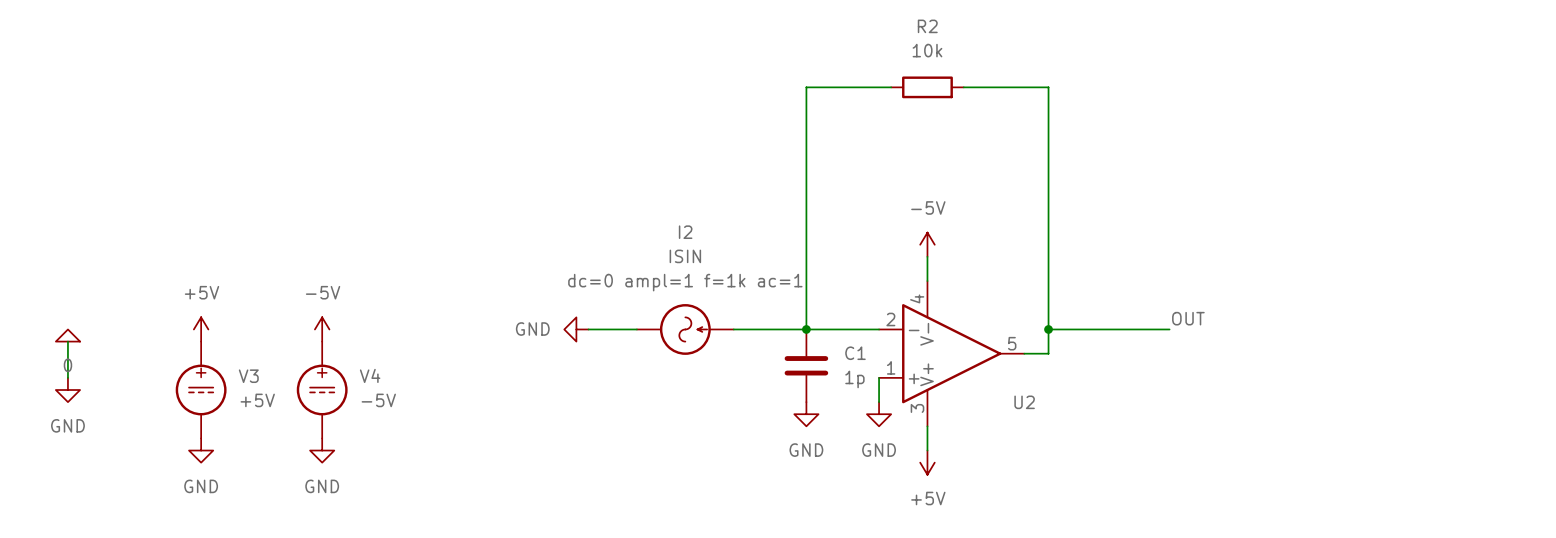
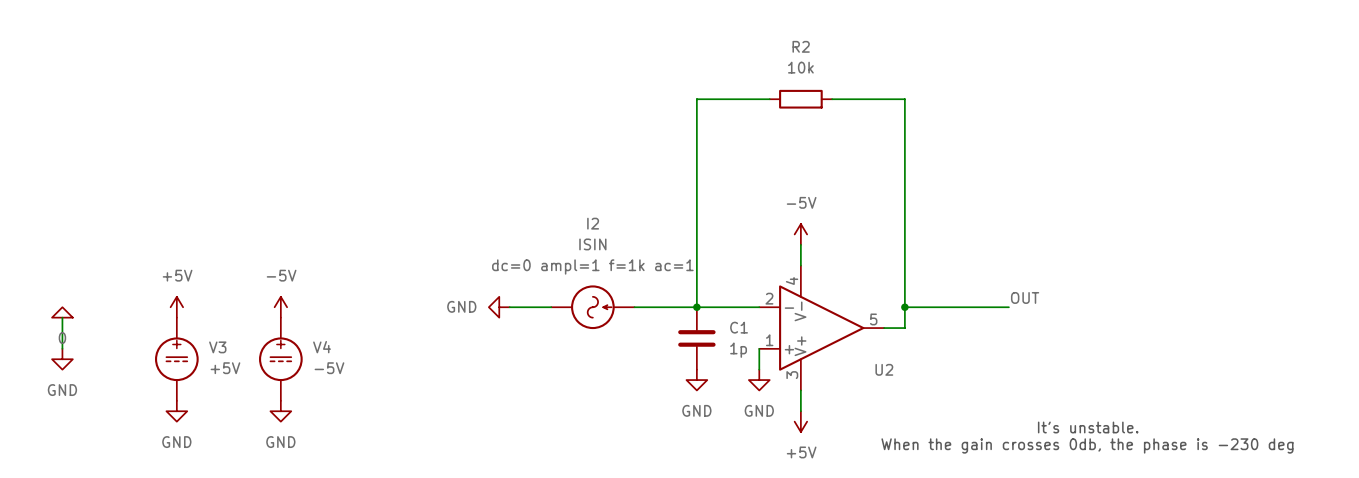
text: none -> It's unstable. (1088, 427)
text: none -> When the gain crosses 0db, the phase is -230 deg (1087, 445)

